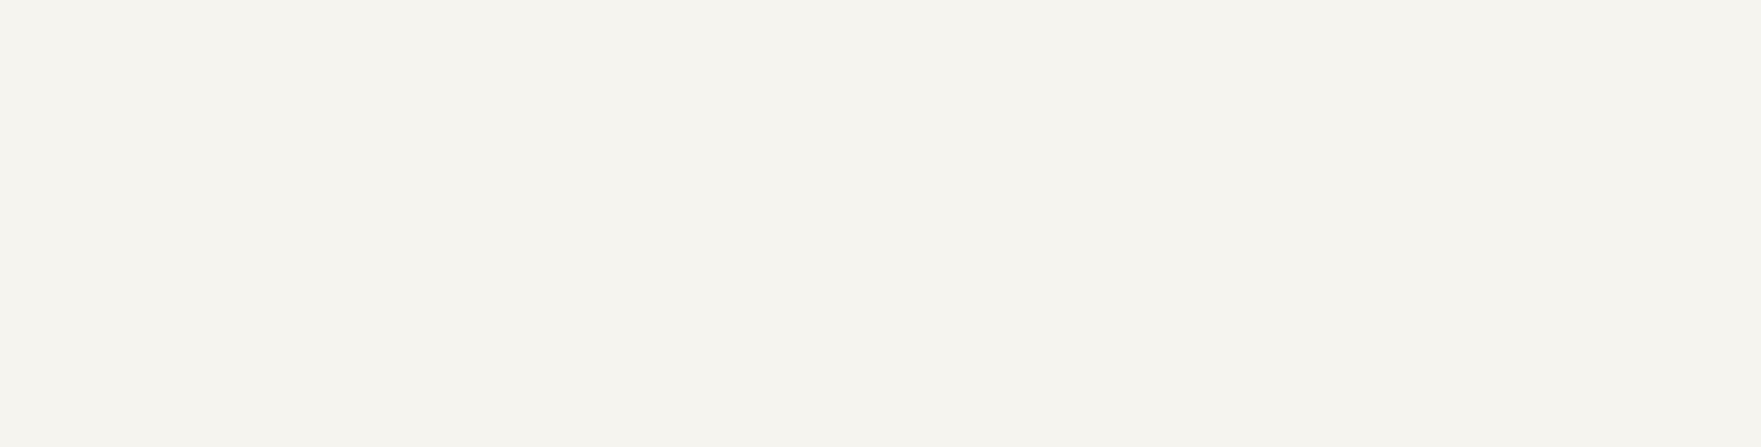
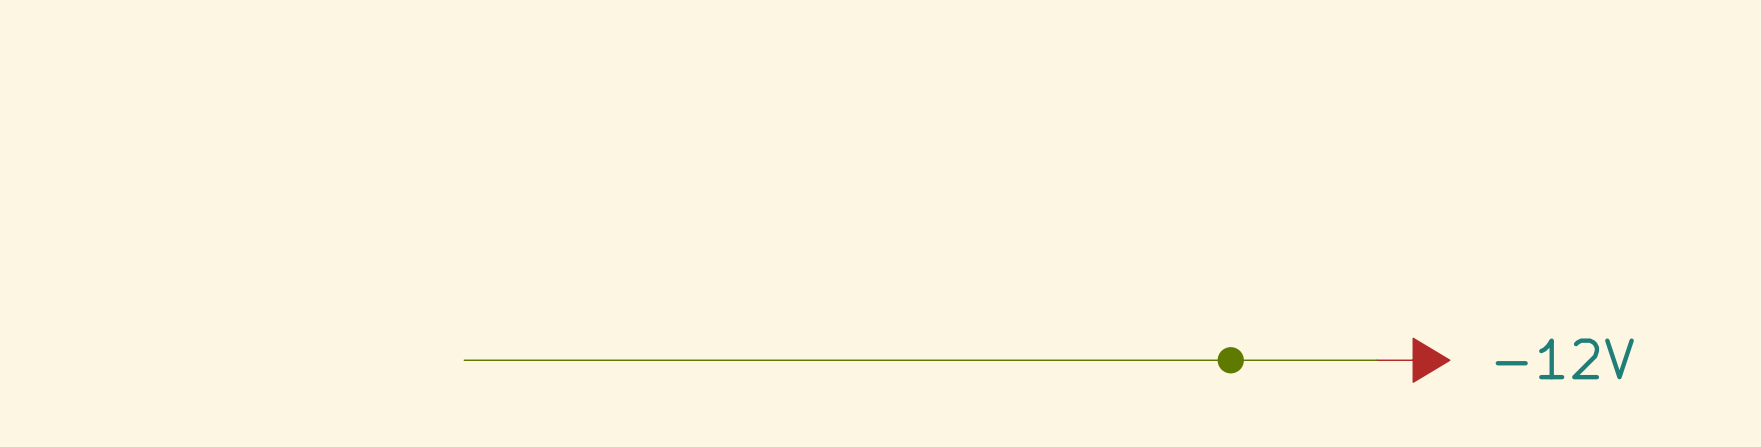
wire: none -> (464, 360) (1376, 360)
junction: none -> (1230, 360)
power symbol: none -> -12V (1413, 360)

